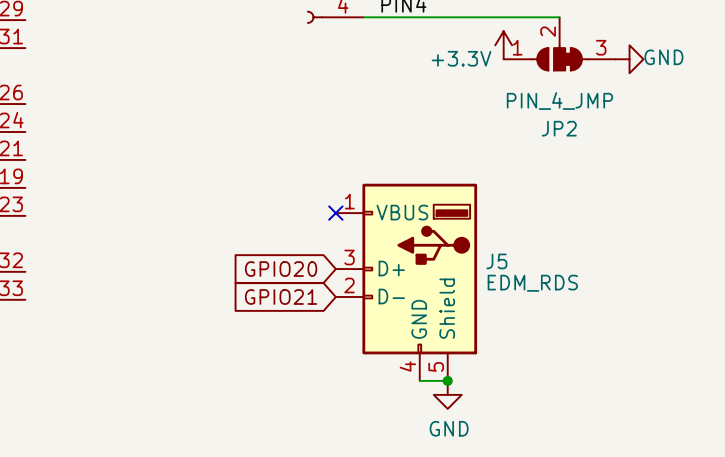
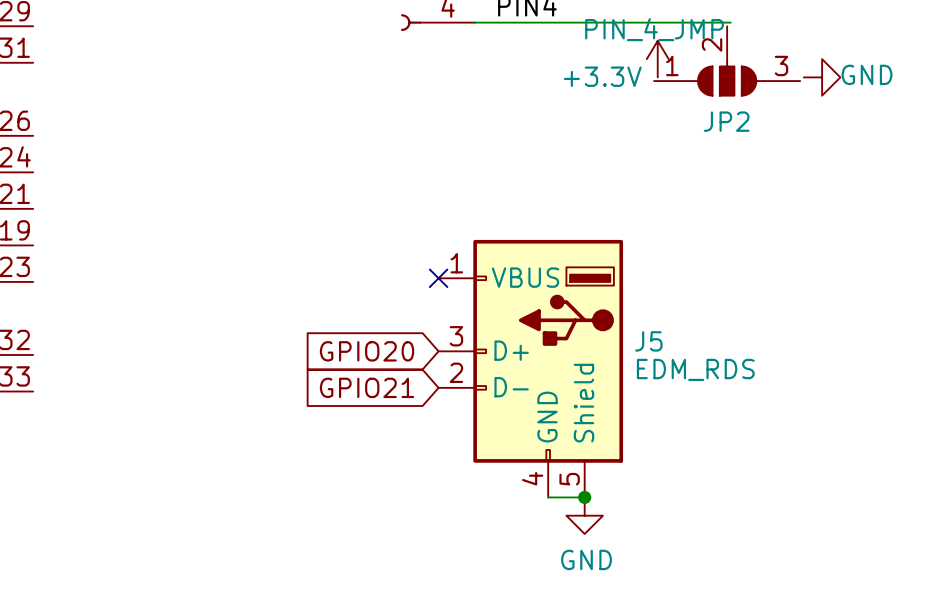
JP2 symbol: [503, 17, 616, 71] -> [654, 26, 801, 96]
JP2 value position: PIN_4_JMP (559, 101) -> PIN_4_JMP (654, 29)
JP2 name position: JP2 (559, 128) -> JP2 (726, 121)

